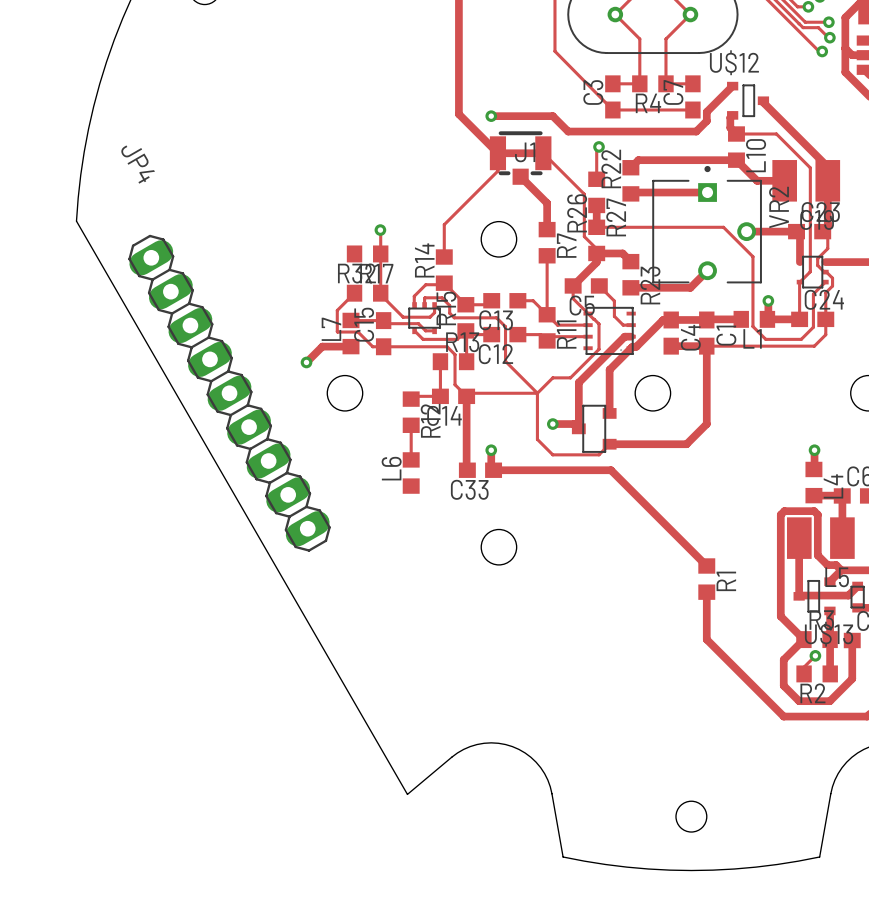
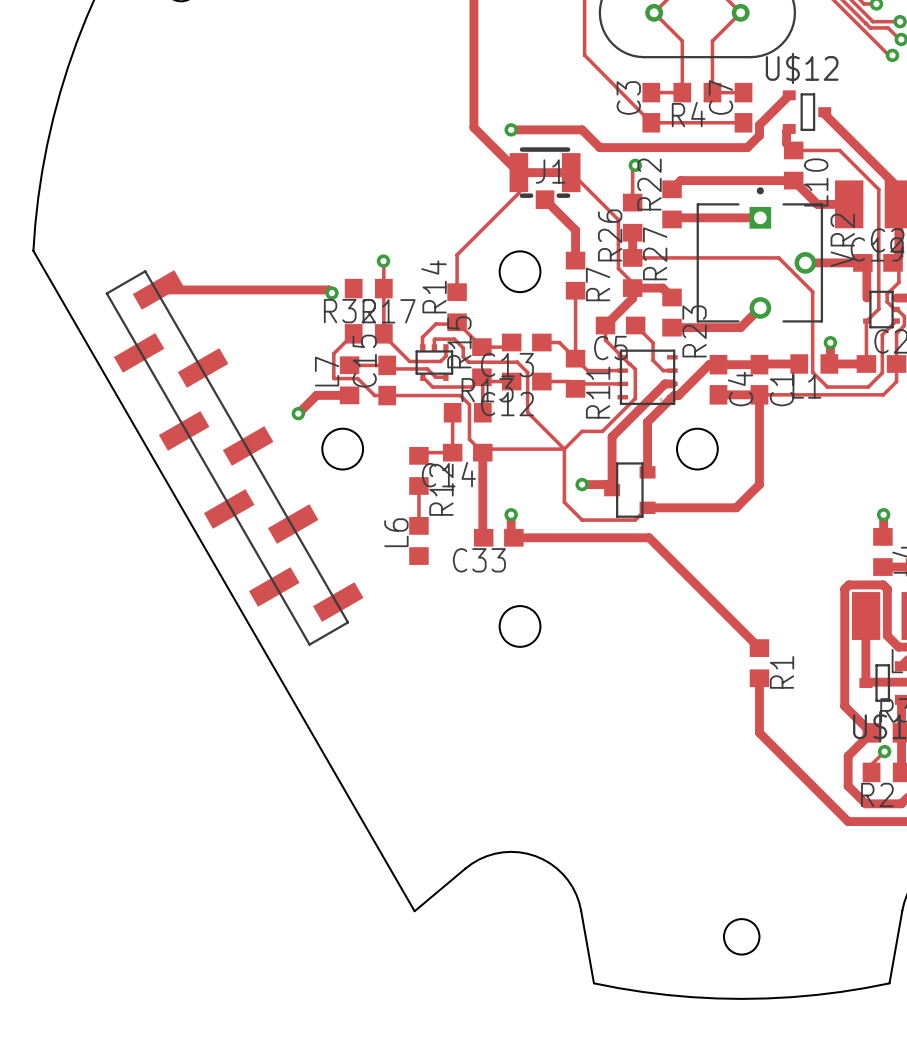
track: none -> (158, 289) (328, 289) (331, 293)
via: none -> (331, 293)
JP4: (229, 393) -> none
part: none -> (234, 457)

